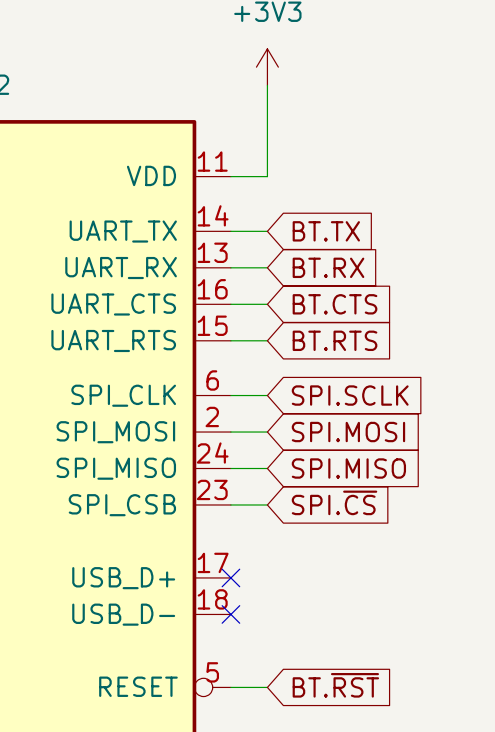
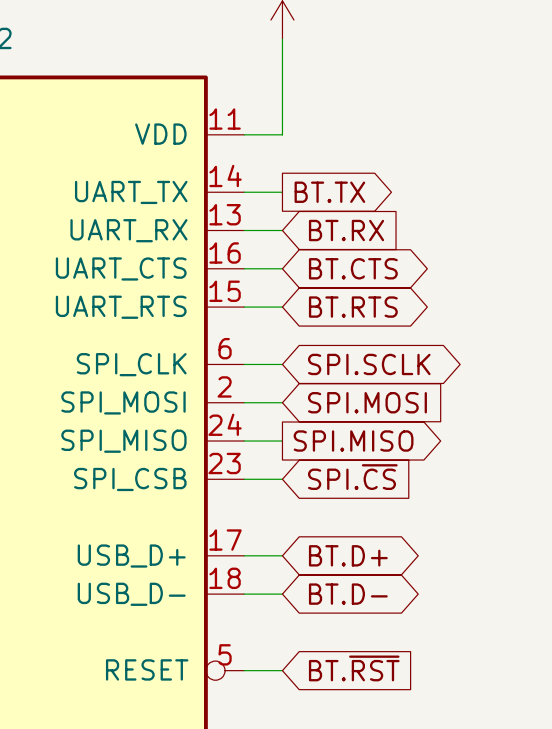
global label shape: input (326, 231) -> output (329, 192)
global label shape: input (334, 304) -> bidirectional (353, 268)
global label shape: input (334, 340) -> bidirectional (353, 307)
global label shape: input (350, 395) -> bidirectional (369, 364)
global label shape: input (348, 468) -> output (353, 441)
wire: none -> (244, 555) (282, 555)
no-connect mark: (230, 577) -> none
global label: none -> BT.D+ (348, 555)
wire: none -> (244, 594) (282, 594)
no-connect mark: (230, 614) -> none
global label: none -> BT.D- (348, 594)

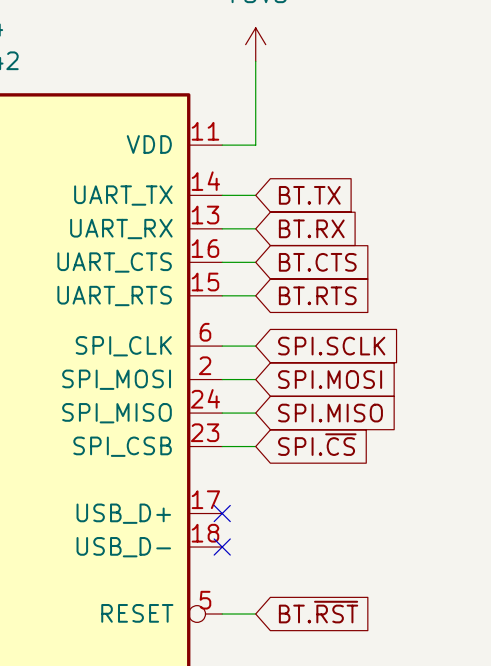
global label shape: output (329, 192) -> input (309, 195)
global label shape: bidirectional (353, 268) -> input (317, 262)
global label shape: bidirectional (353, 307) -> input (317, 295)
global label shape: bidirectional (369, 364) -> input (331, 346)
global label shape: output (353, 441) -> input (330, 413)
wire: (244, 555) (282, 555) -> none
no-connect mark: none -> (222, 513)
global label: BT.D+ (348, 555) -> none
wire: (244, 594) (282, 594) -> none
no-connect mark: none -> (222, 547)
global label: BT.D- (348, 594) -> none

